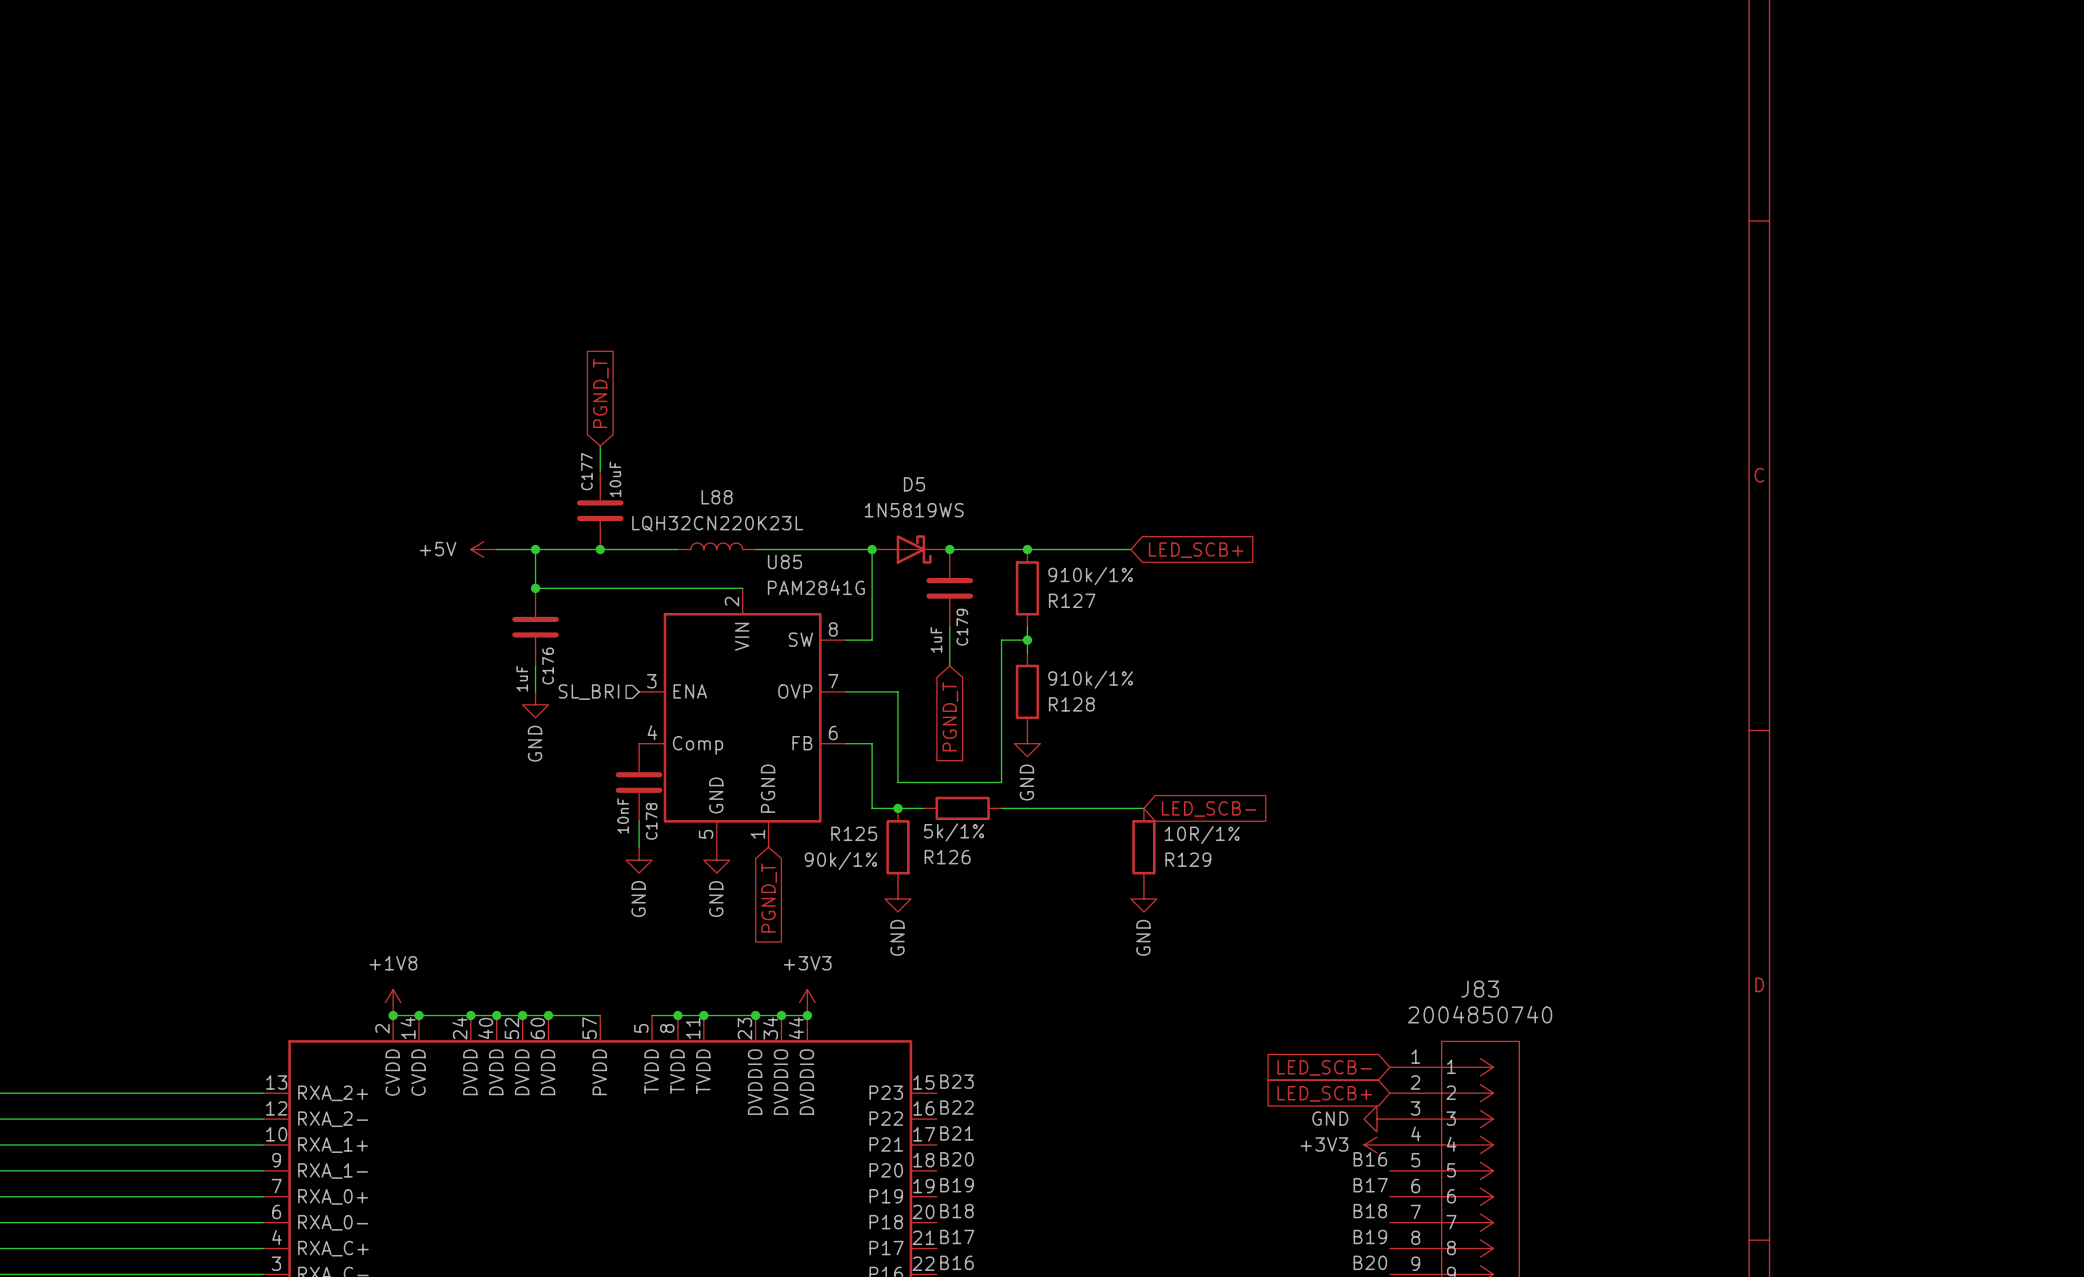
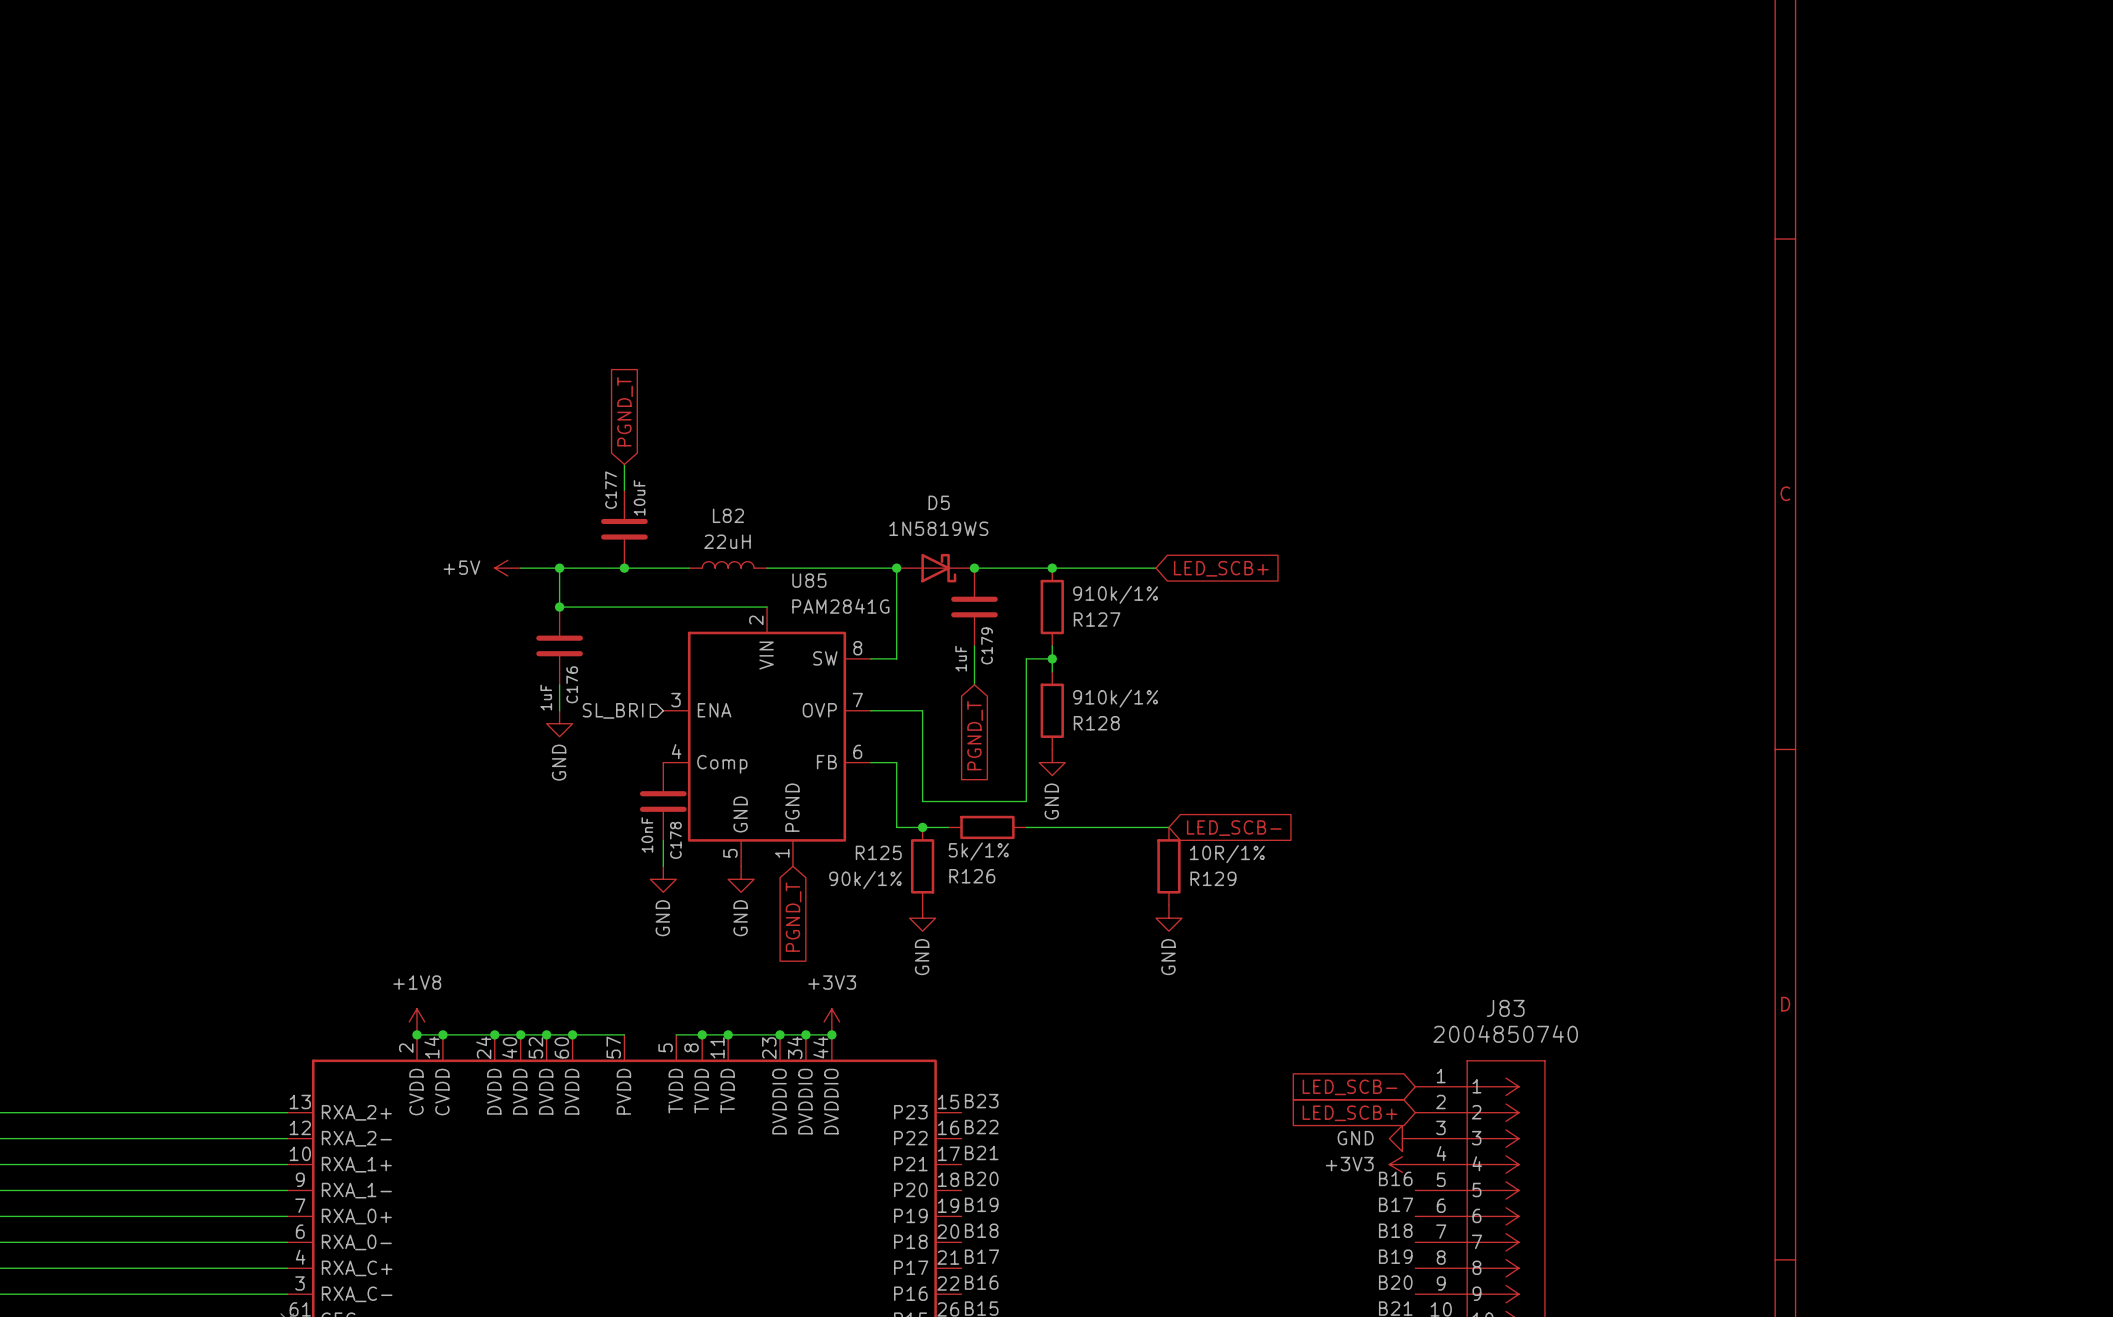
L82: none -> 22uH (728, 564)
L88: LQH32CN220K23L (716, 546) -> none

